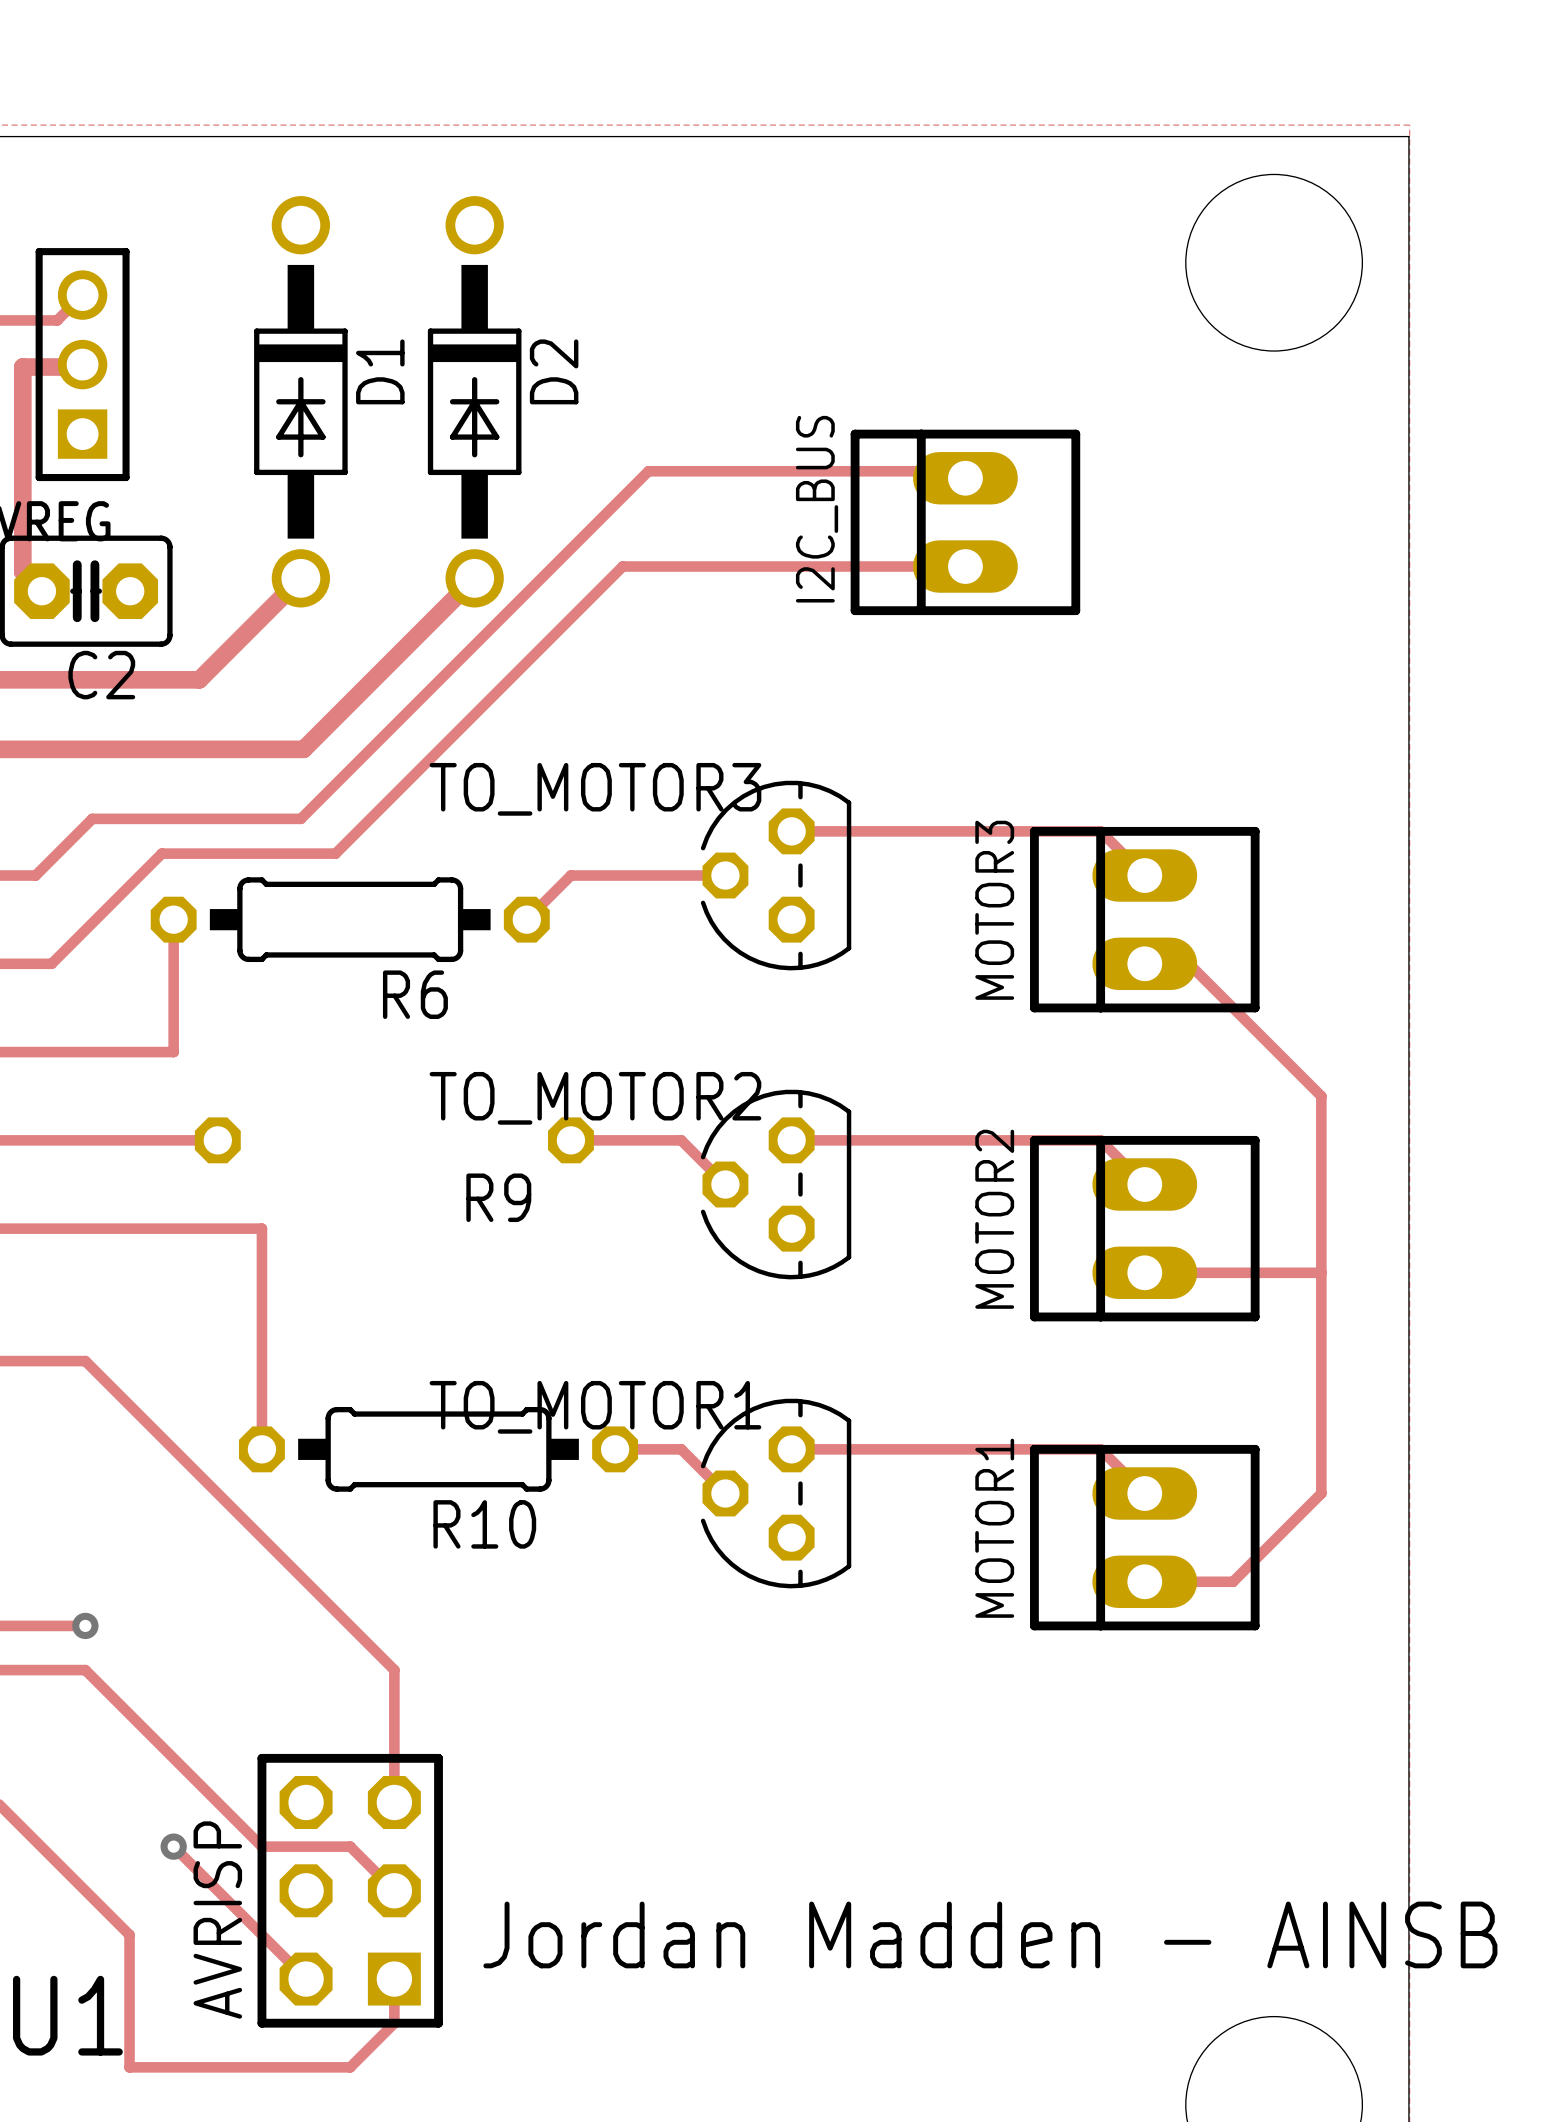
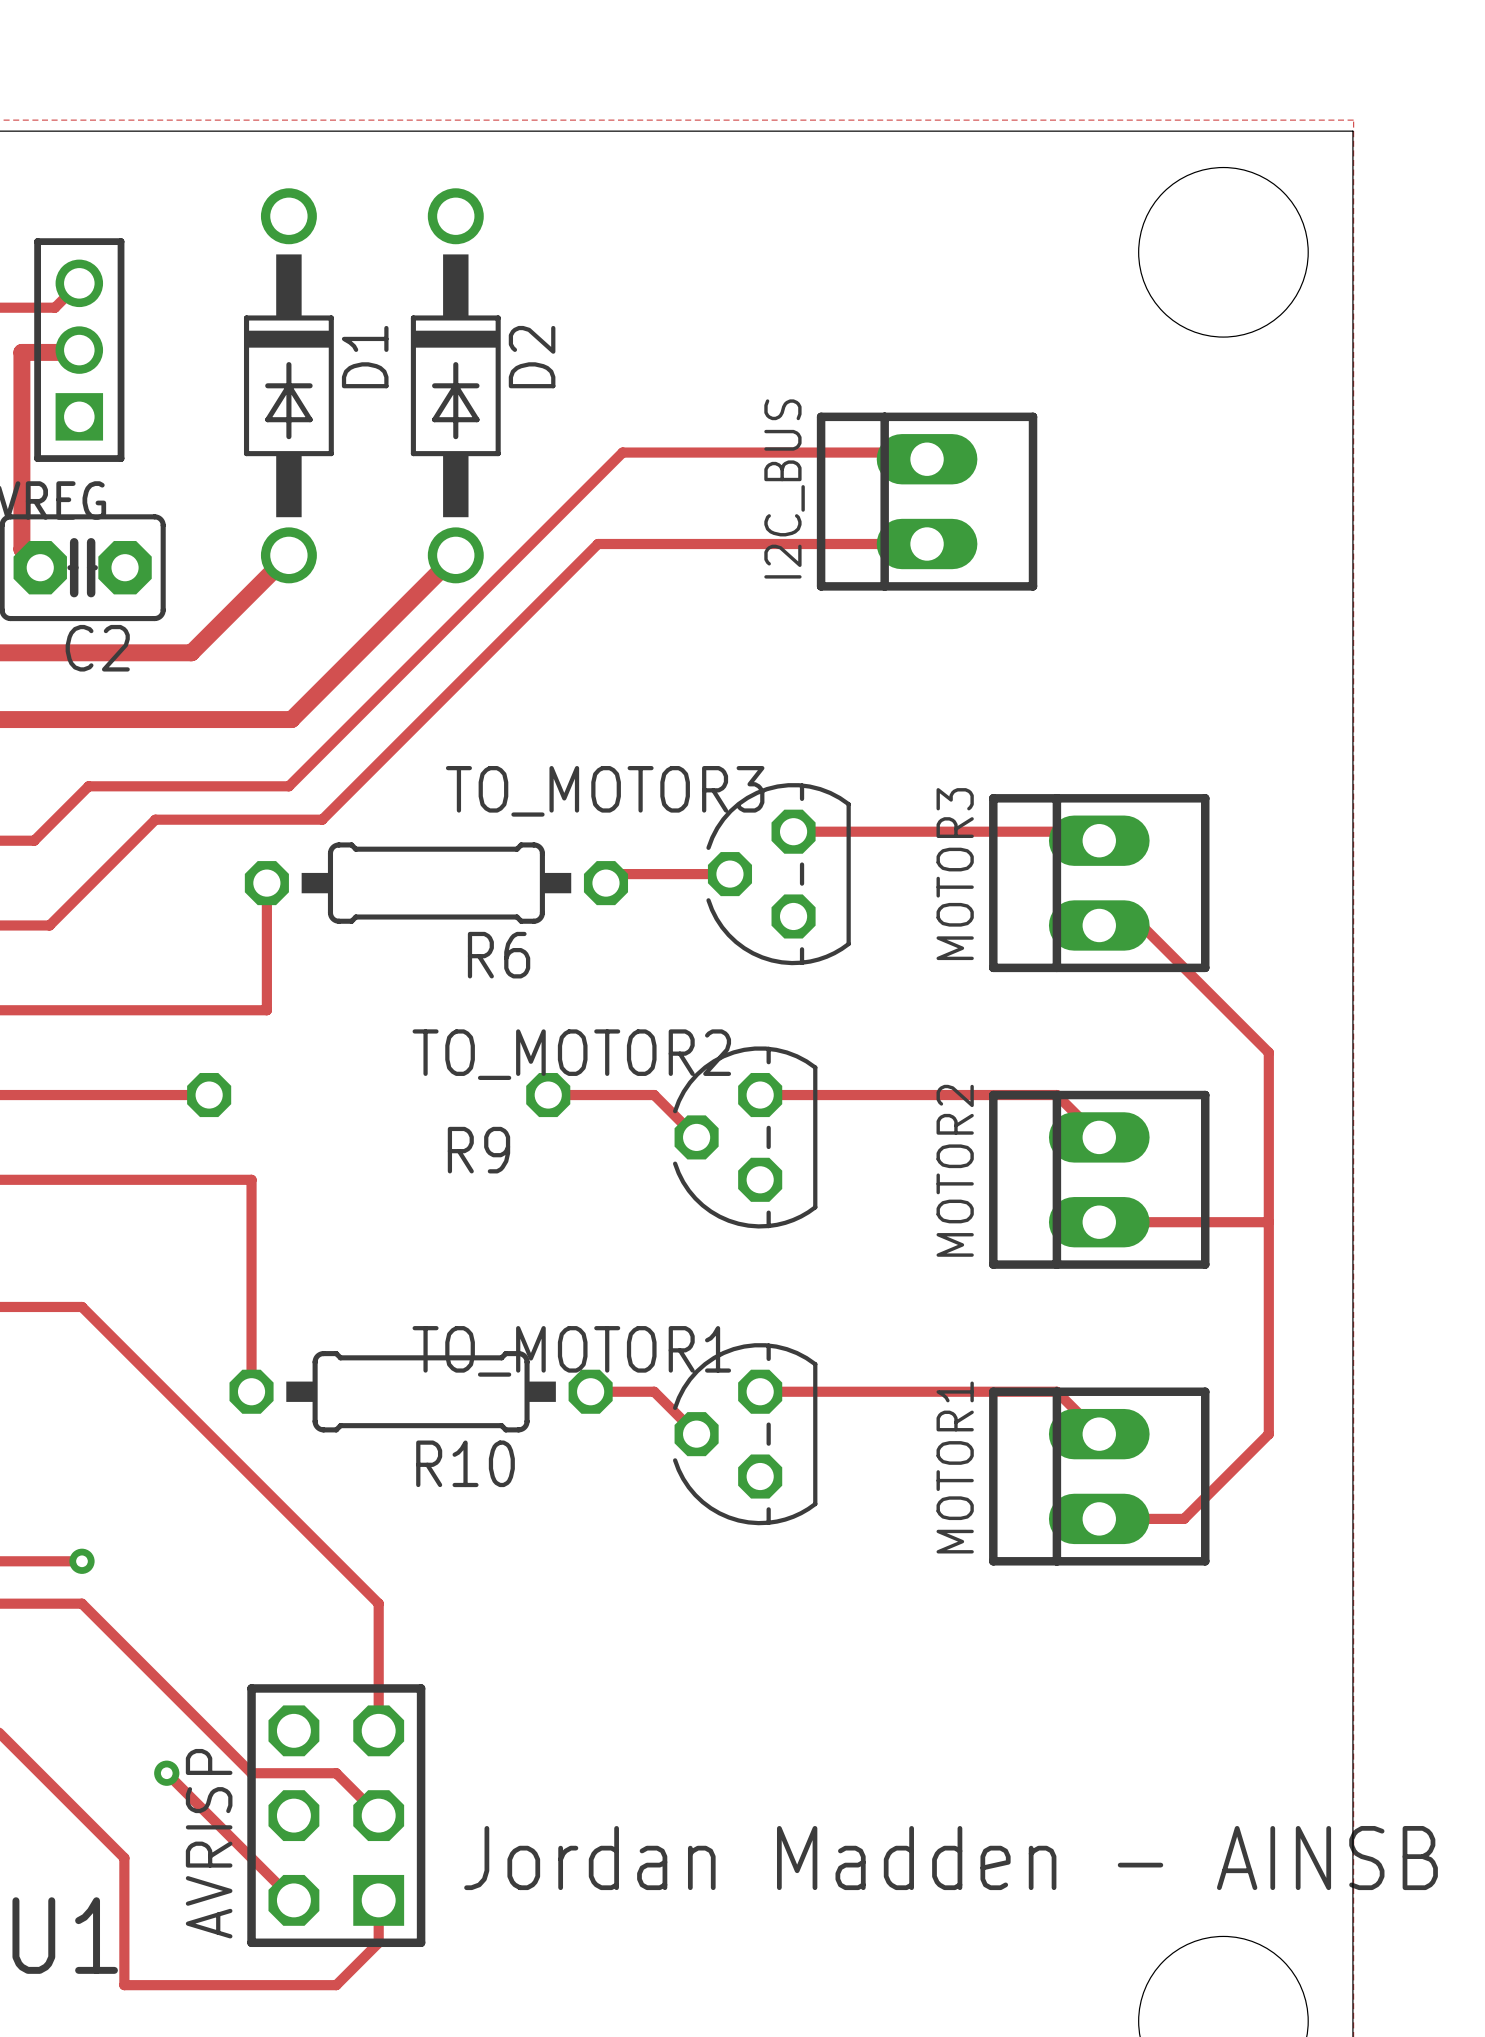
track: (791, 831) (1100, 831) (1135, 866) -> (793, 831) (1090, 831)
track: (725, 875) (570, 875) (526, 919) -> none
TO_MOTOR3 position: (776, 875) -> (778, 874)
track: none -> (729, 874) (614, 874) (605, 883)
track: (173, 919) (173, 1052) -> (266, 883) (266, 1010) (166, 1010)
R6 position: (350, 919) -> (436, 883)

